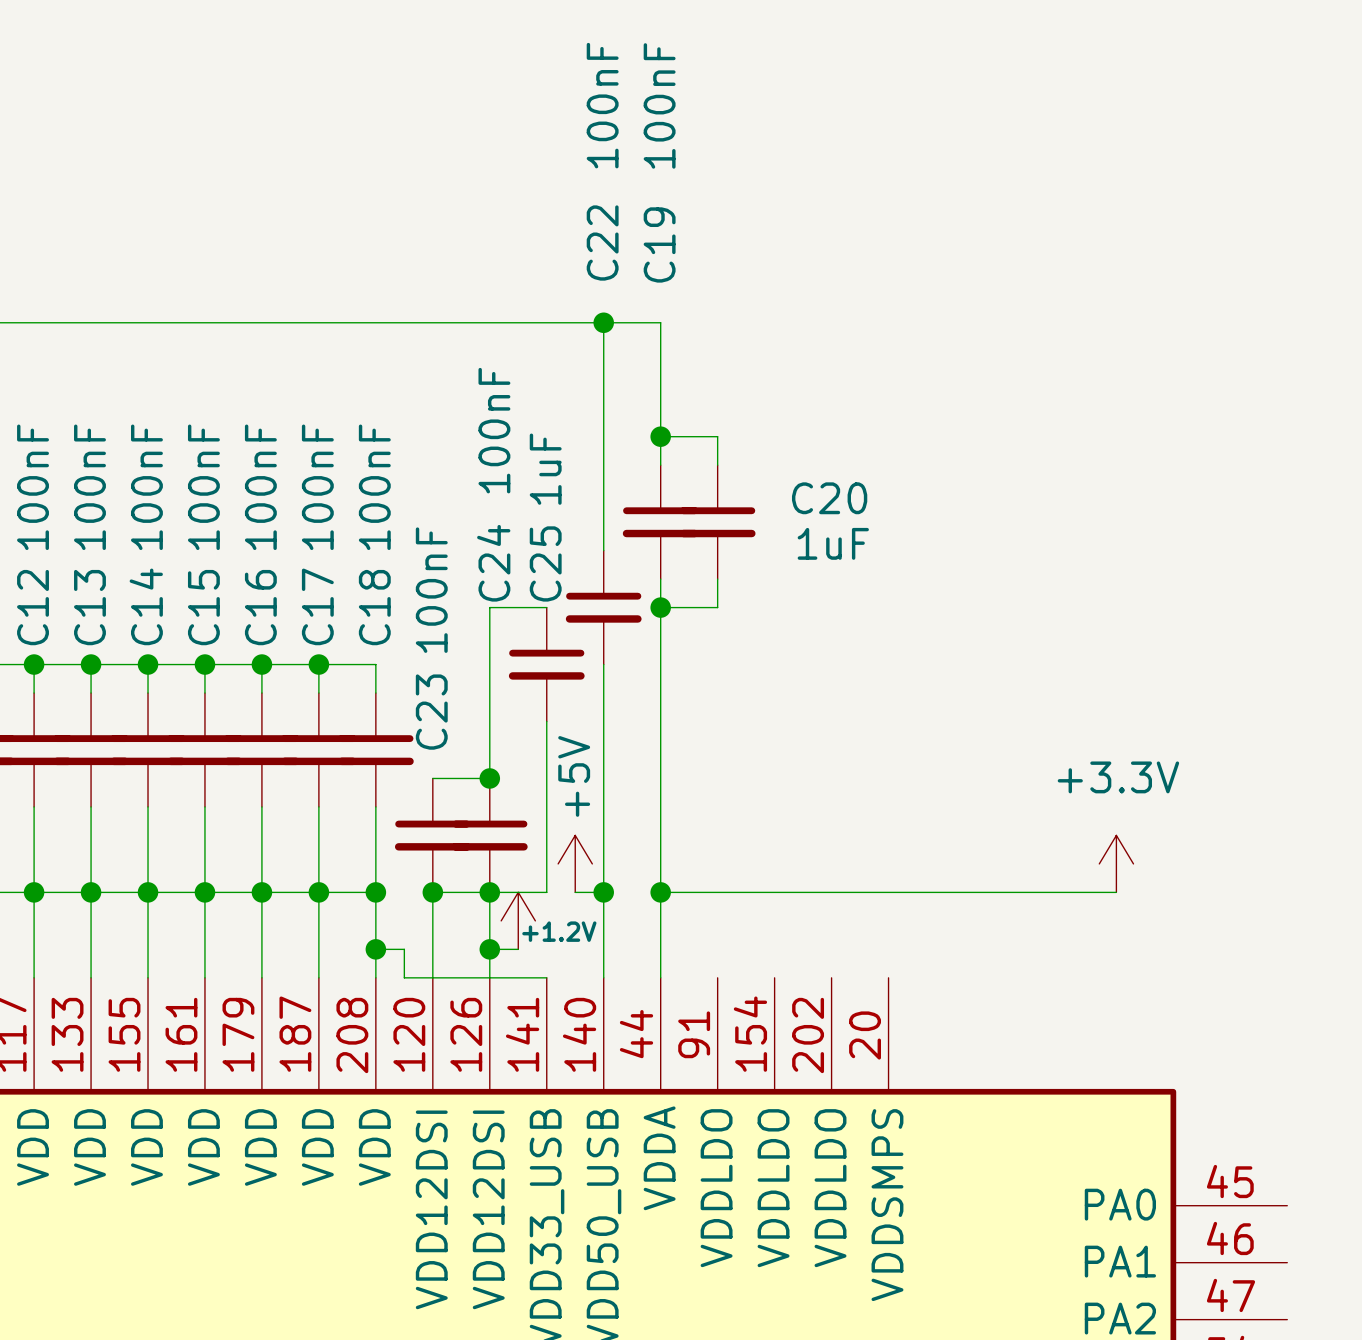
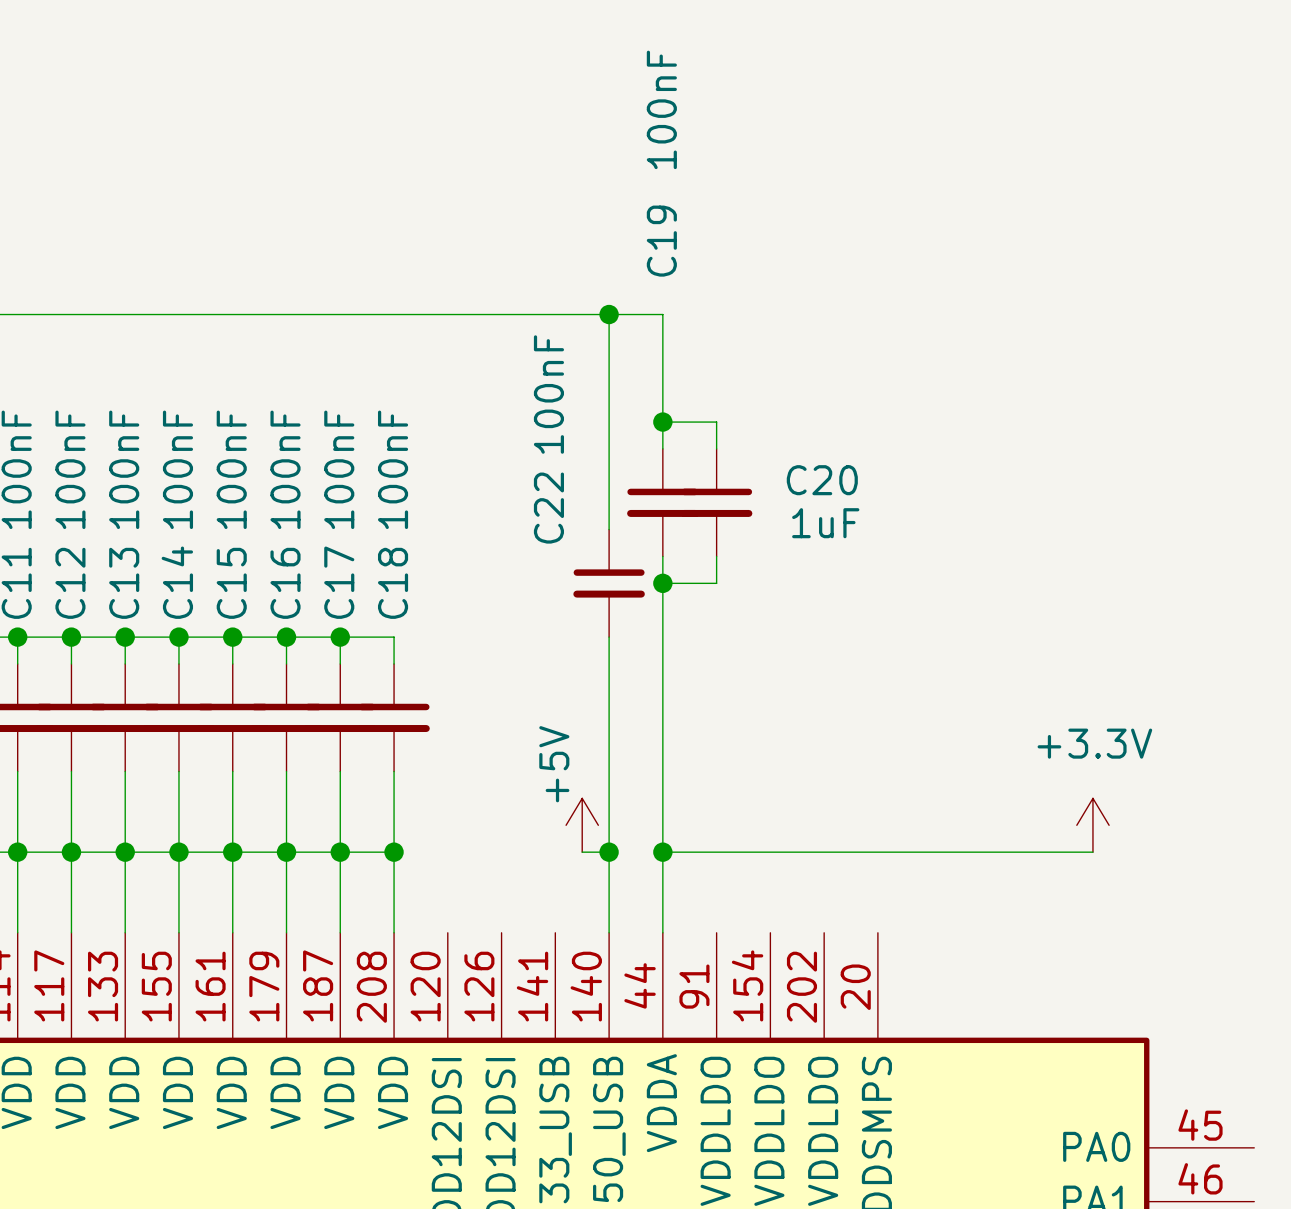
C22 value position: 100nF (602, 105) -> 100nF (548, 394)
C22 name position: C22 (602, 243) -> C22 (548, 508)
wire: (546, 607) (489, 607) (489, 778) (432, 778) -> none
C25: 1uF (546, 664) -> none
wire: (546, 721) (546, 892) (432, 892) (432, 977) -> none
power symbol text position: +5V (574, 776) -> +5V (554, 764)
junction: (489, 778) -> none
C23: 100nF (432, 835) -> none
C24: 100nF (489, 835) -> none
junction: (432, 892) -> none
wire: (489, 892) (489, 977) -> none
junction: (489, 892) -> none
power symbol: +1.2V (518, 920) -> none
wire: (375, 949) (404, 949) (404, 977) (546, 977) -> none
junction: (375, 949) -> none
wire: (489, 949) (518, 949) -> none
junction: (489, 949) -> none

